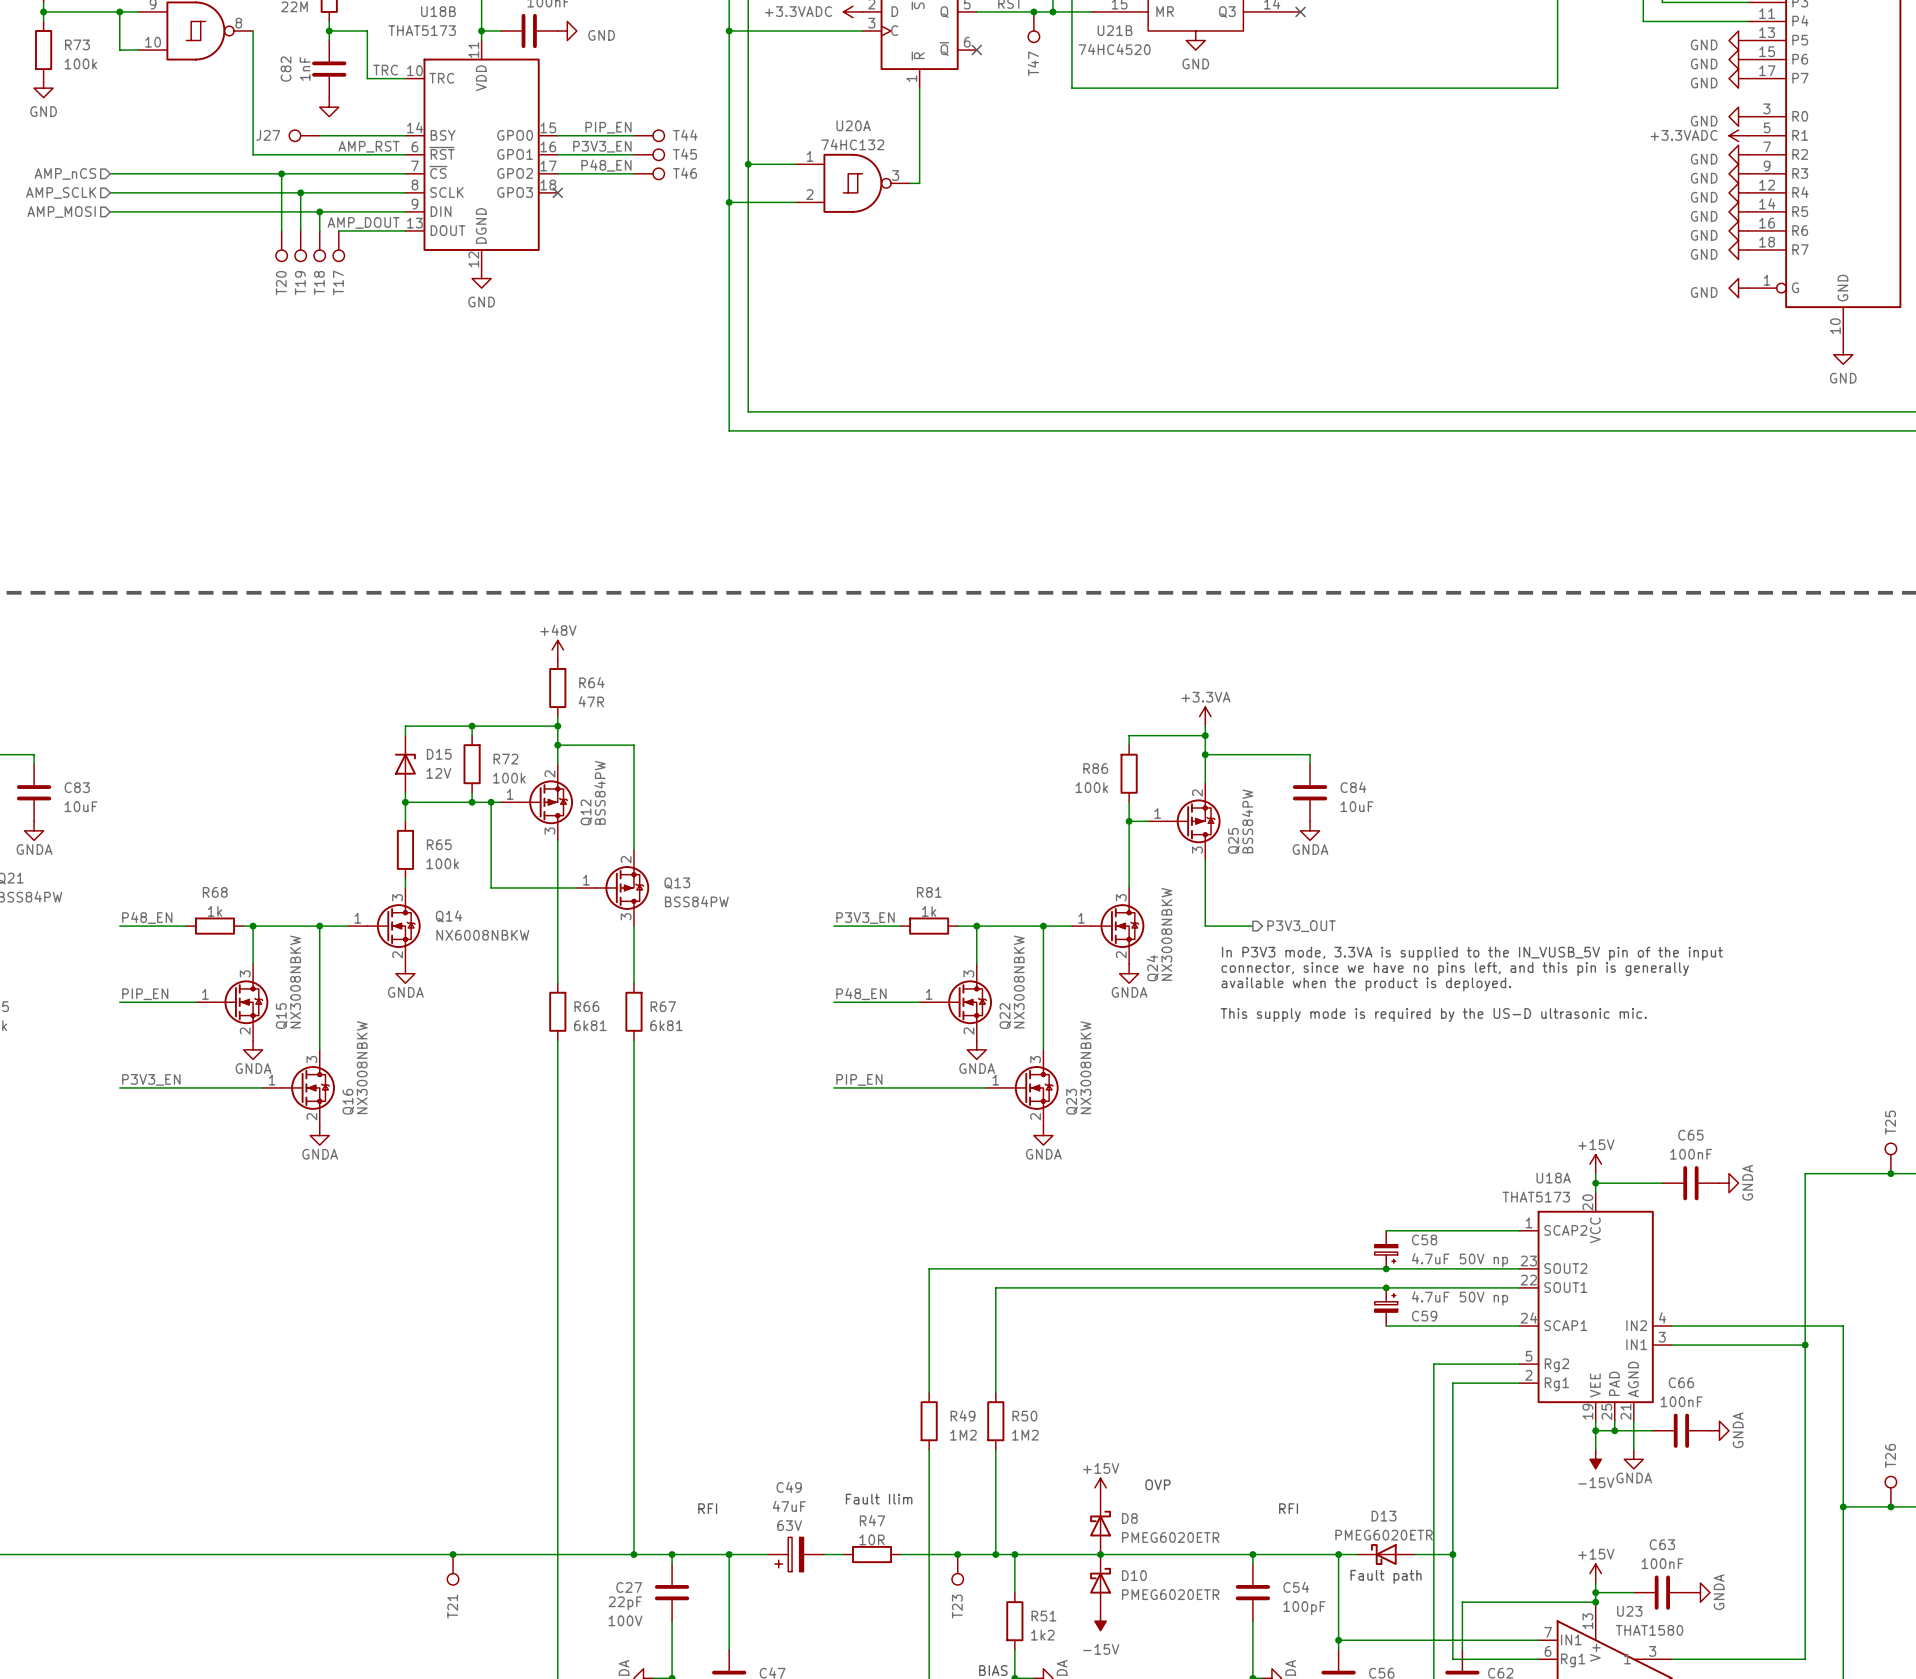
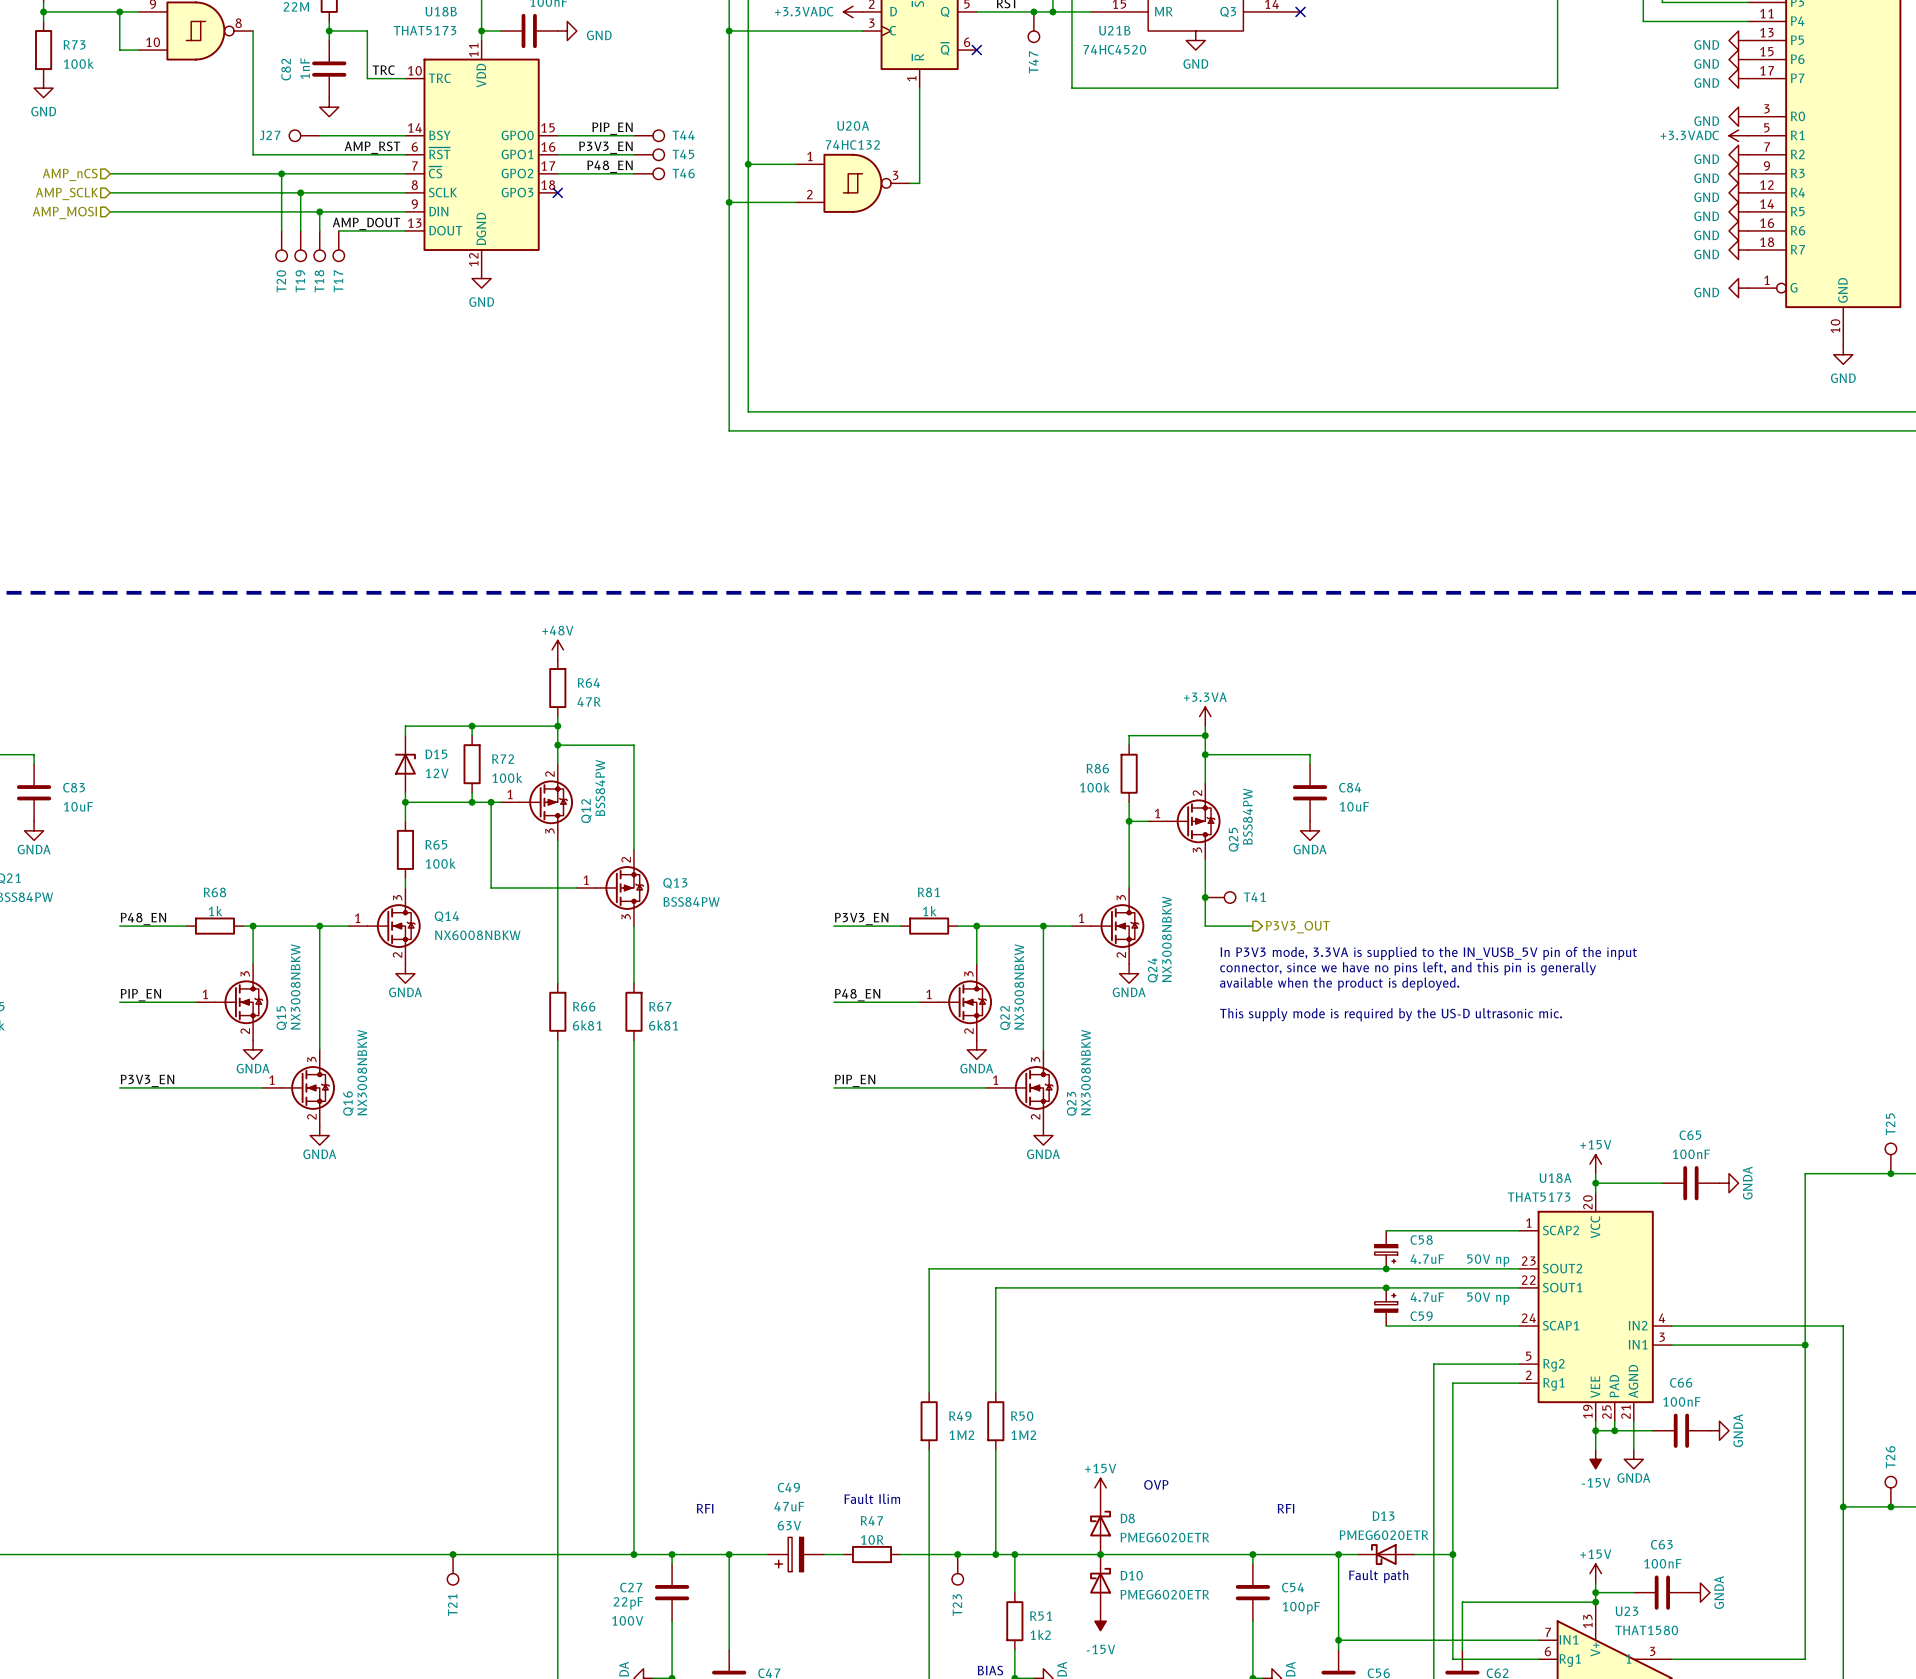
junction: none -> (1205, 897)
T41: none -> (1220, 897)

